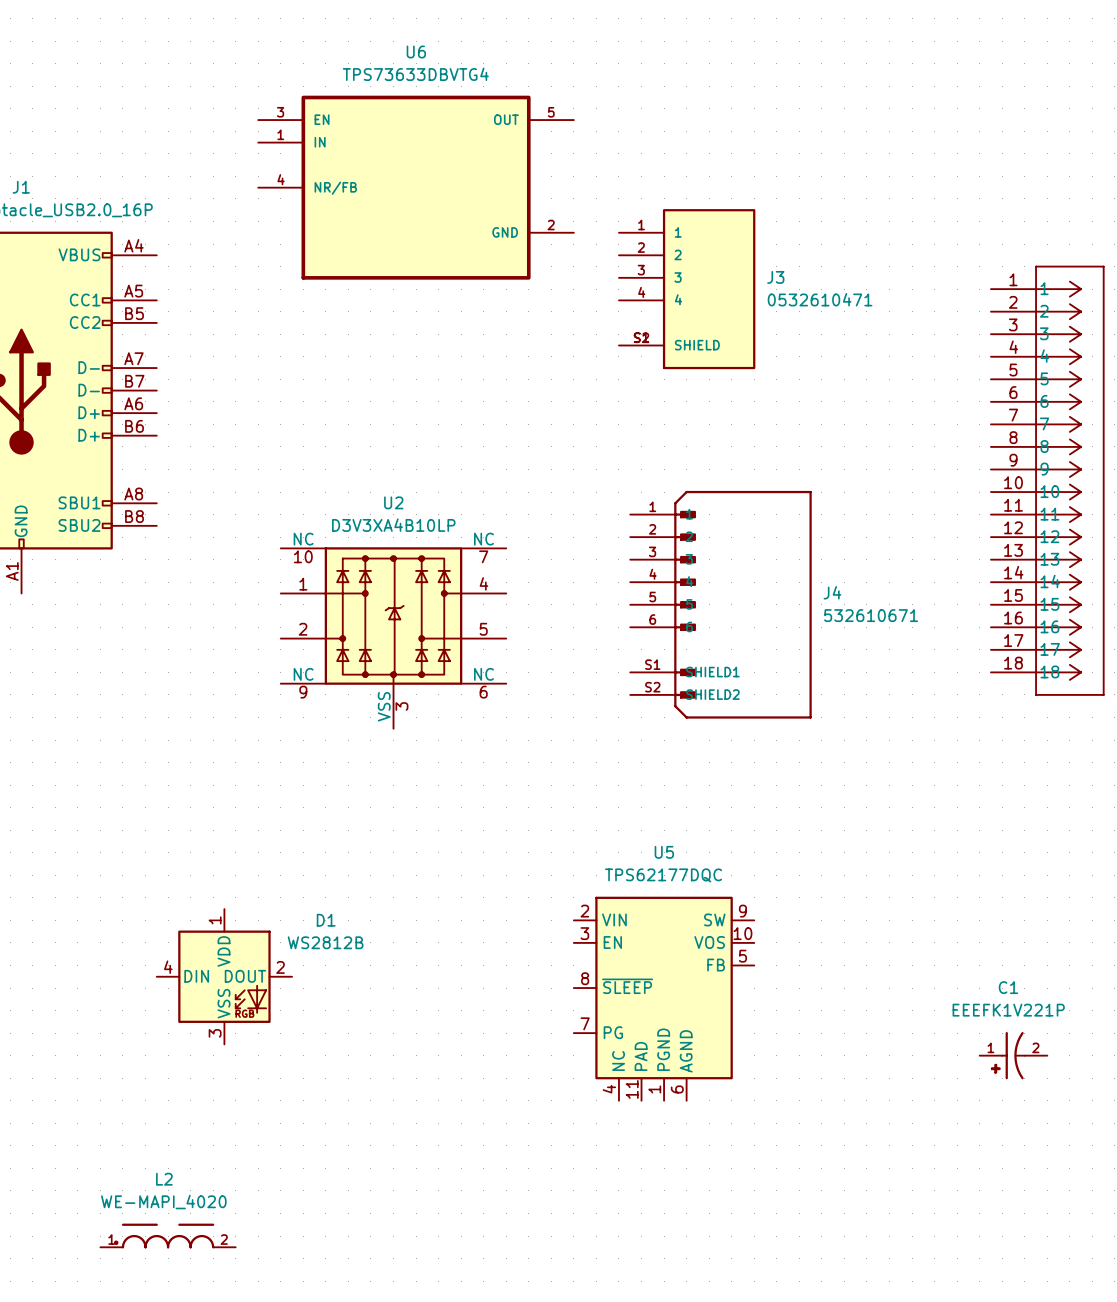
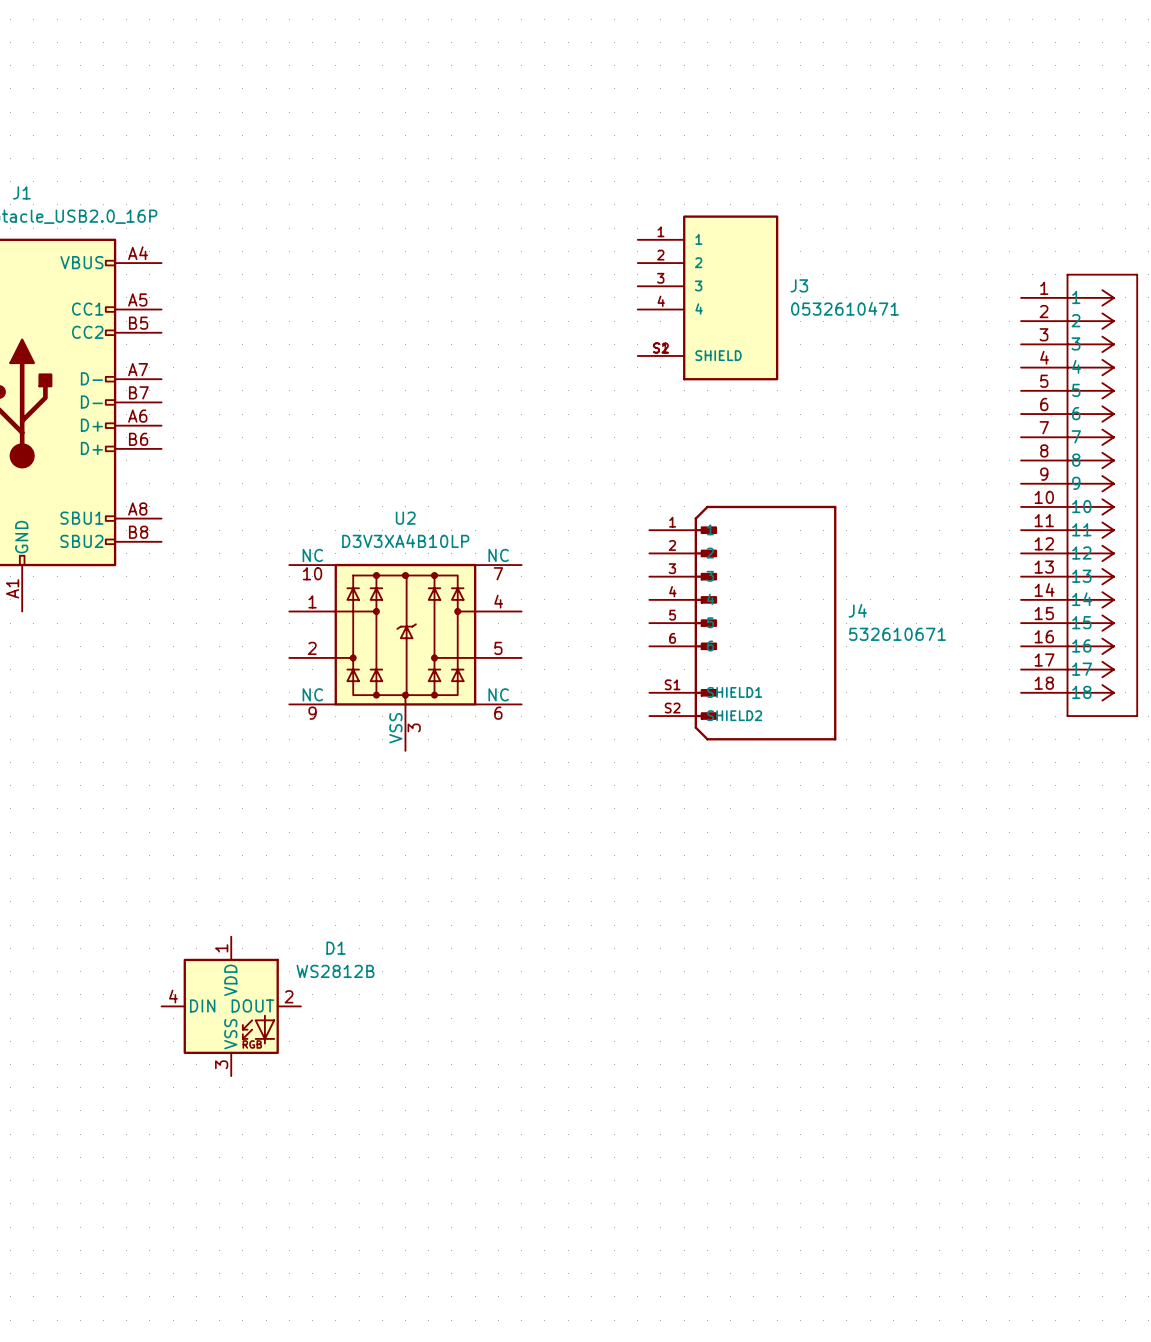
U6: TPS73633DBVTG4 (416, 187) -> none
U5: TPS62177DQC (664, 998) -> none
C1: EEEFK1V221P (1013, 1055) -> none
L2: WE-MAPI_4020 (168, 1236) -> none

